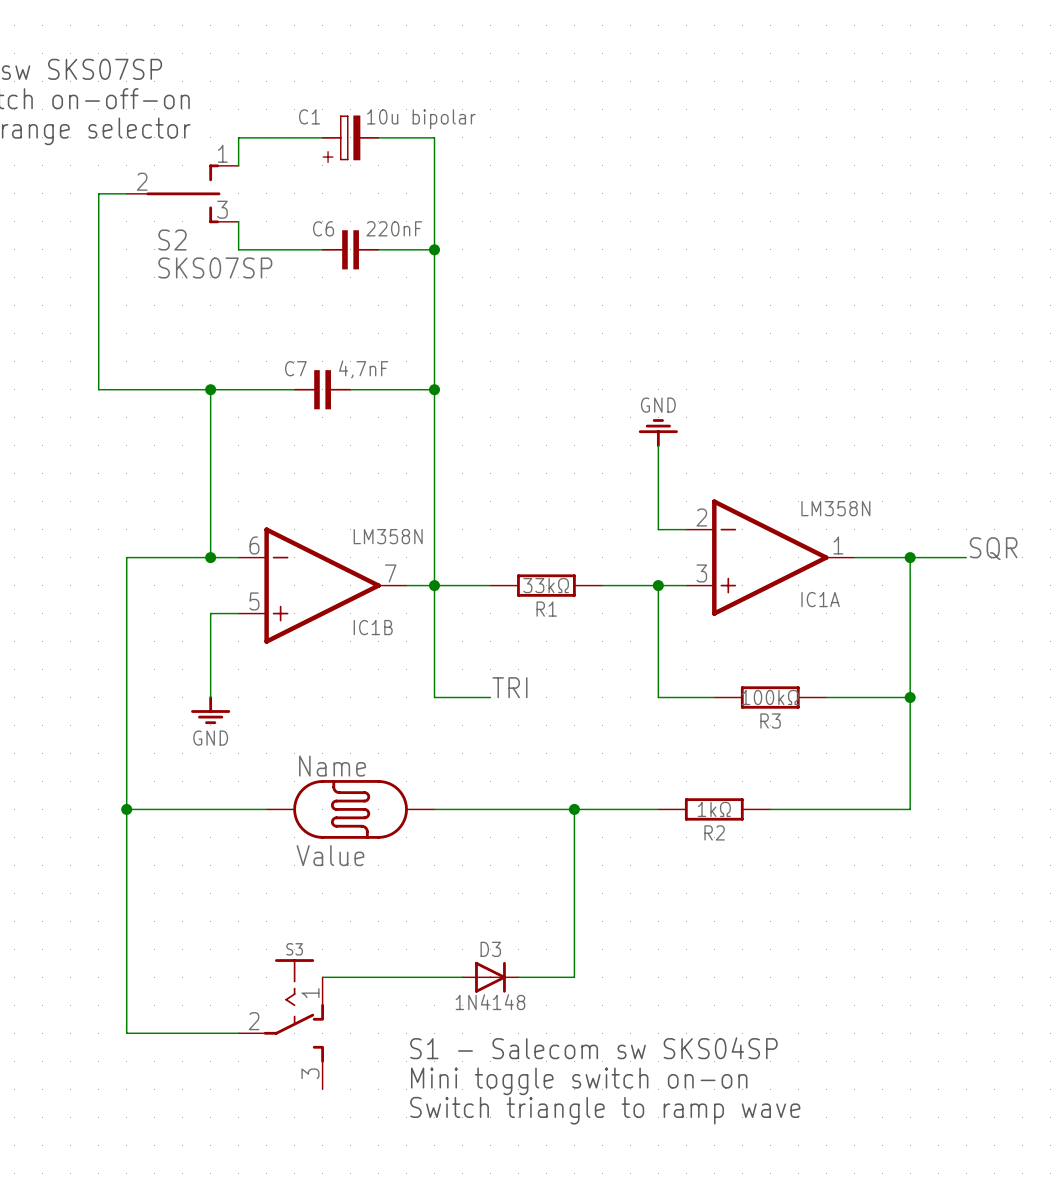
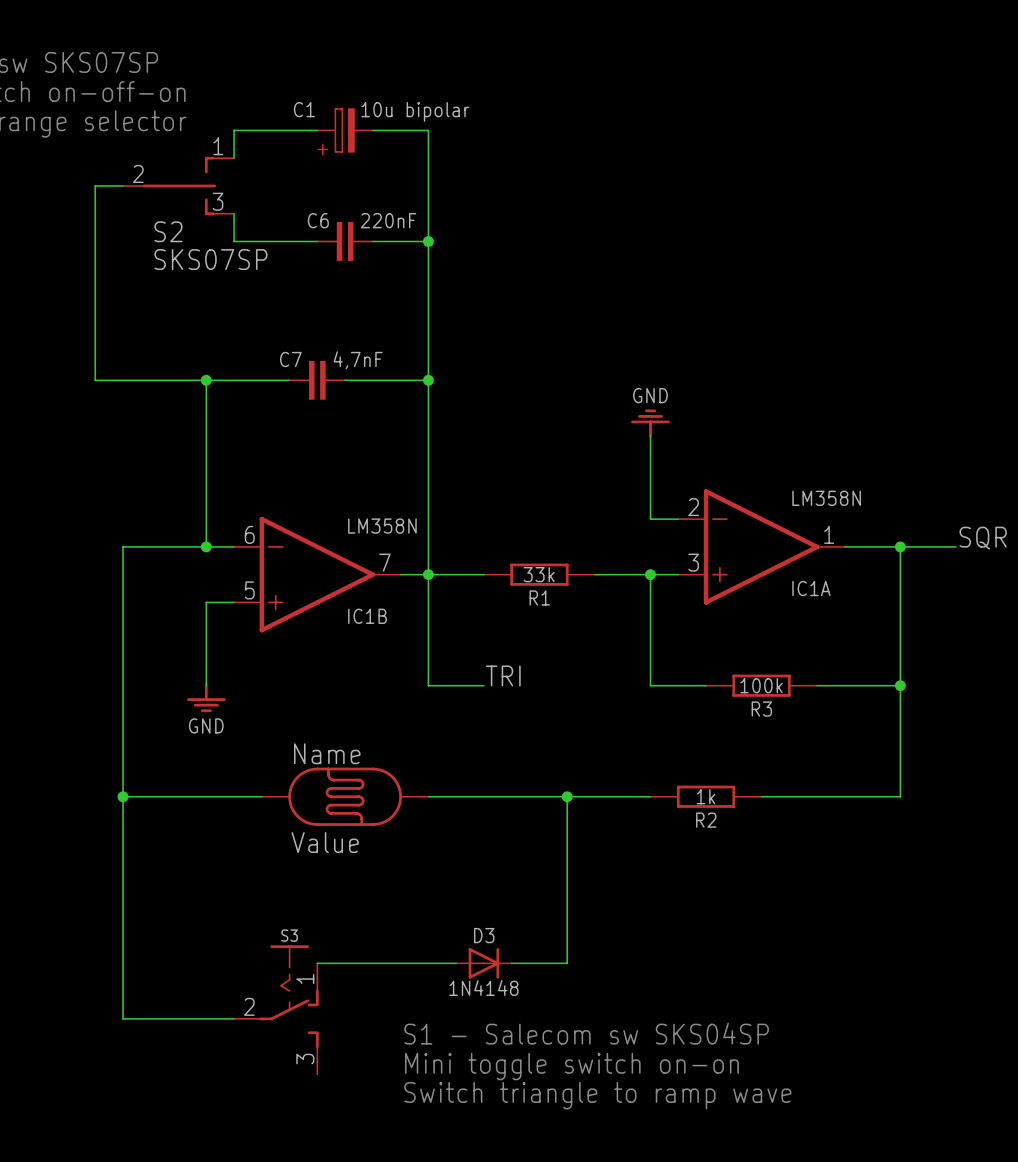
R1 value: 33kΩ (546, 585) -> 33k (539, 574)
R3 value: 100kΩ (770, 697) -> 100k (761, 685)
R2 value: 1kΩ (714, 809) -> 1k (706, 796)

